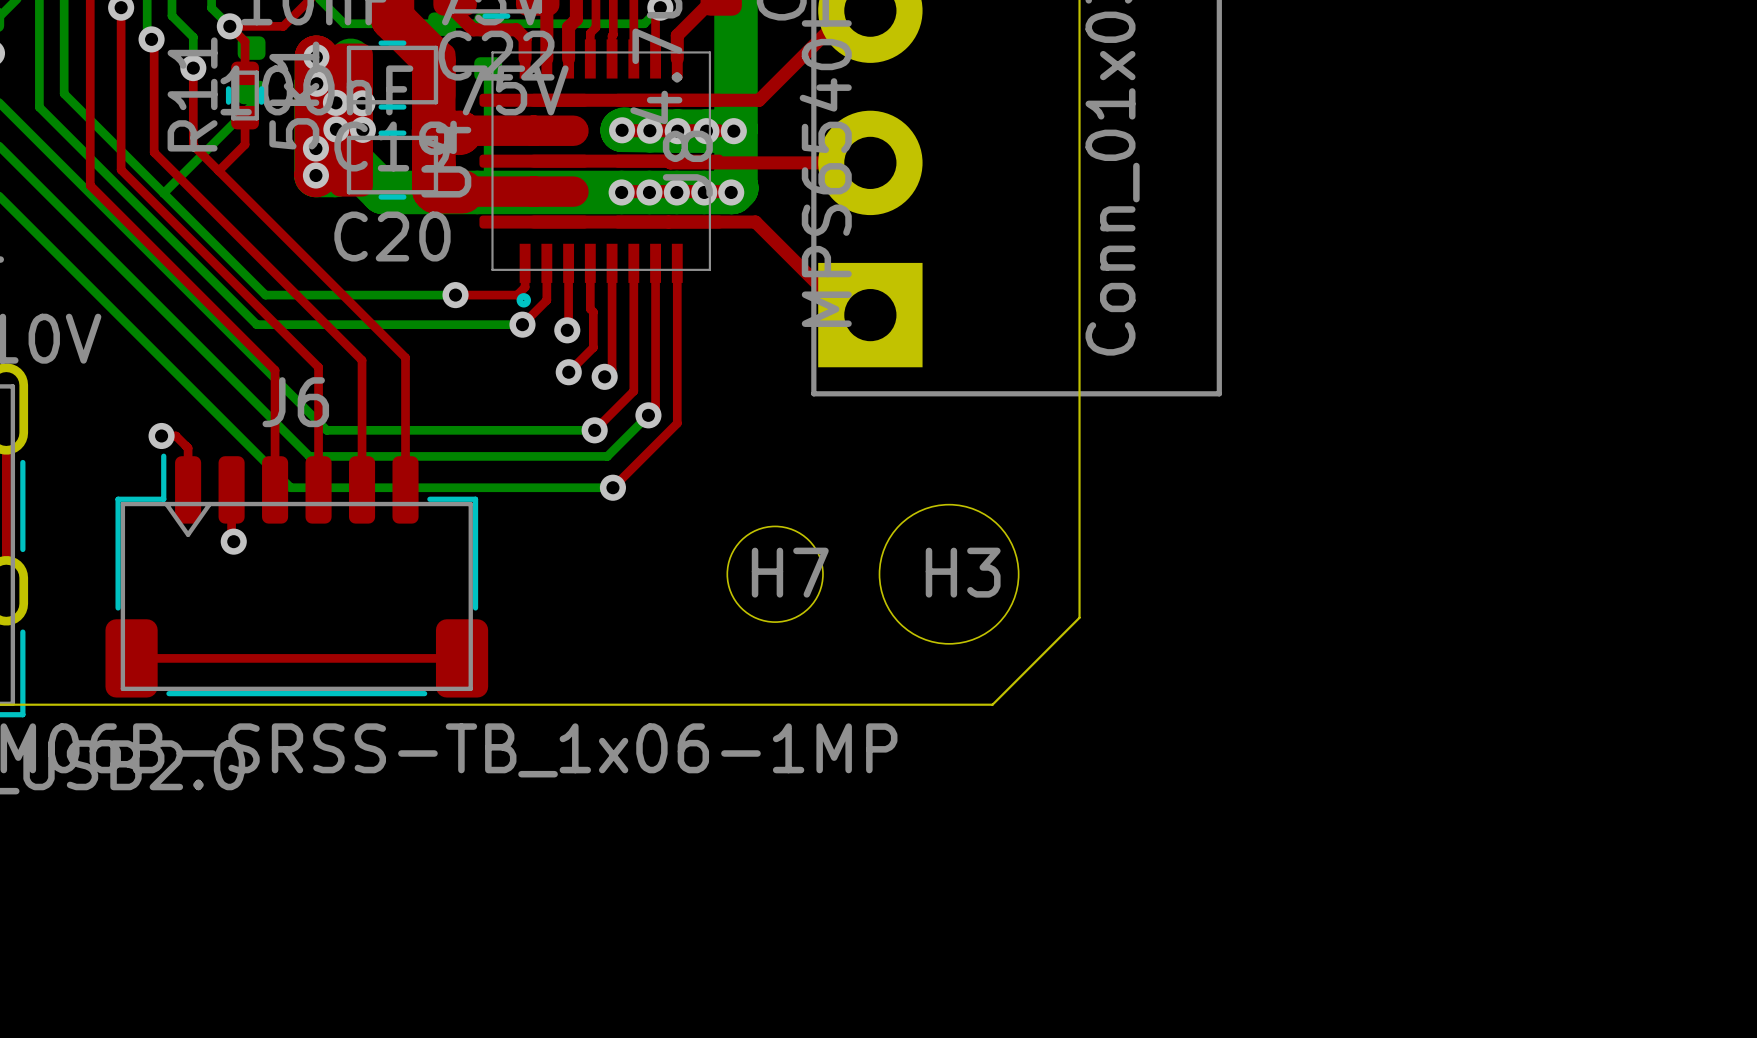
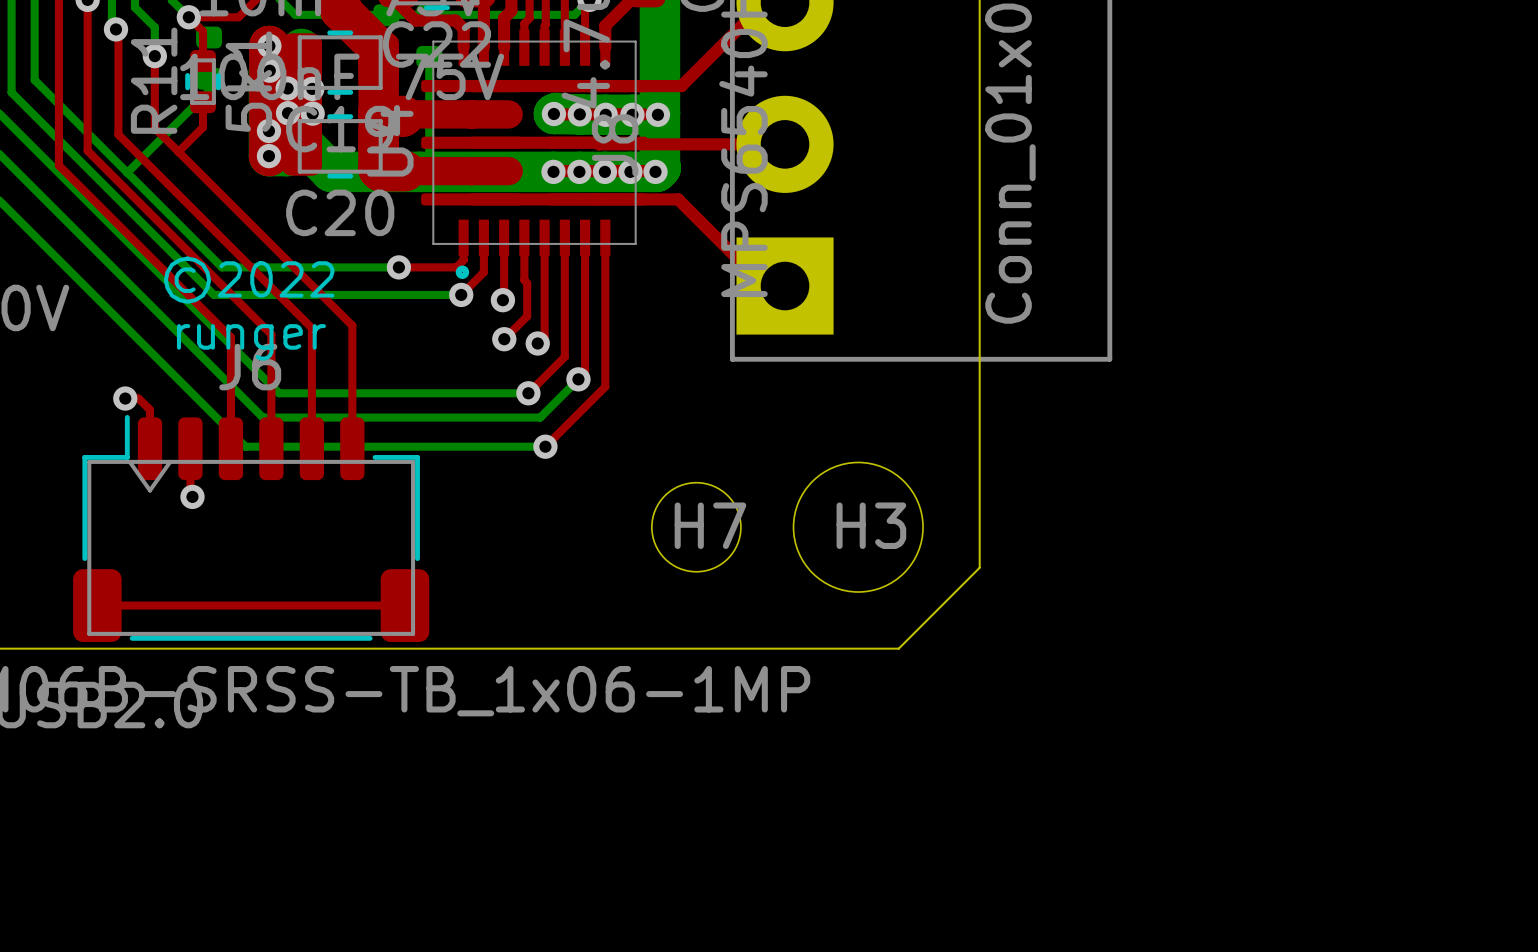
text: none -> ©2022 (249, 280)
text: none -> runger (251, 342)

